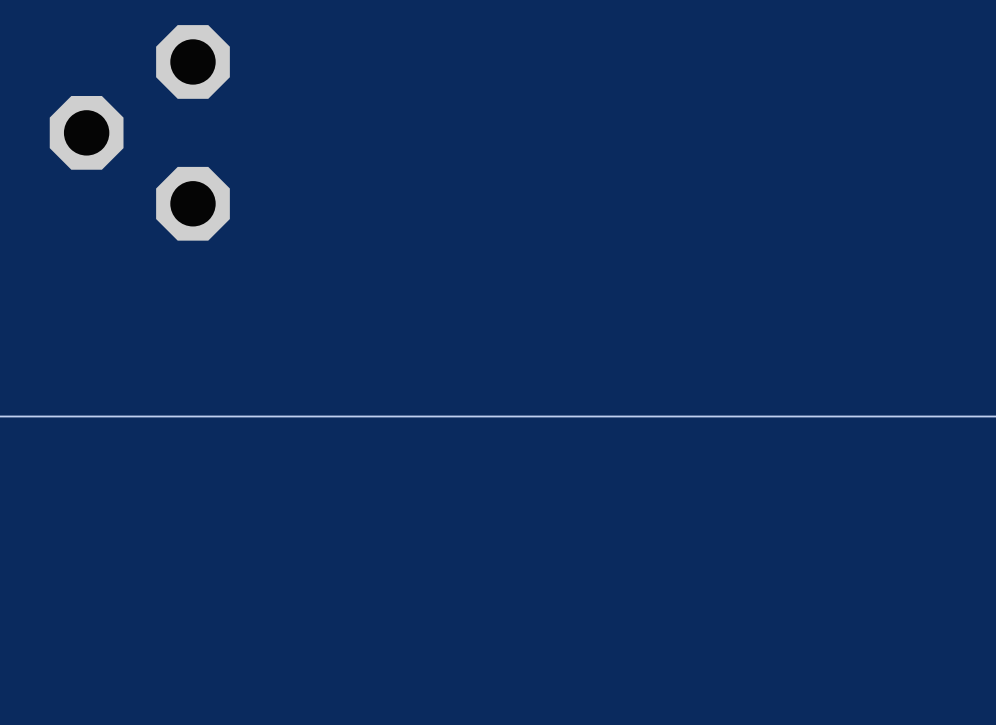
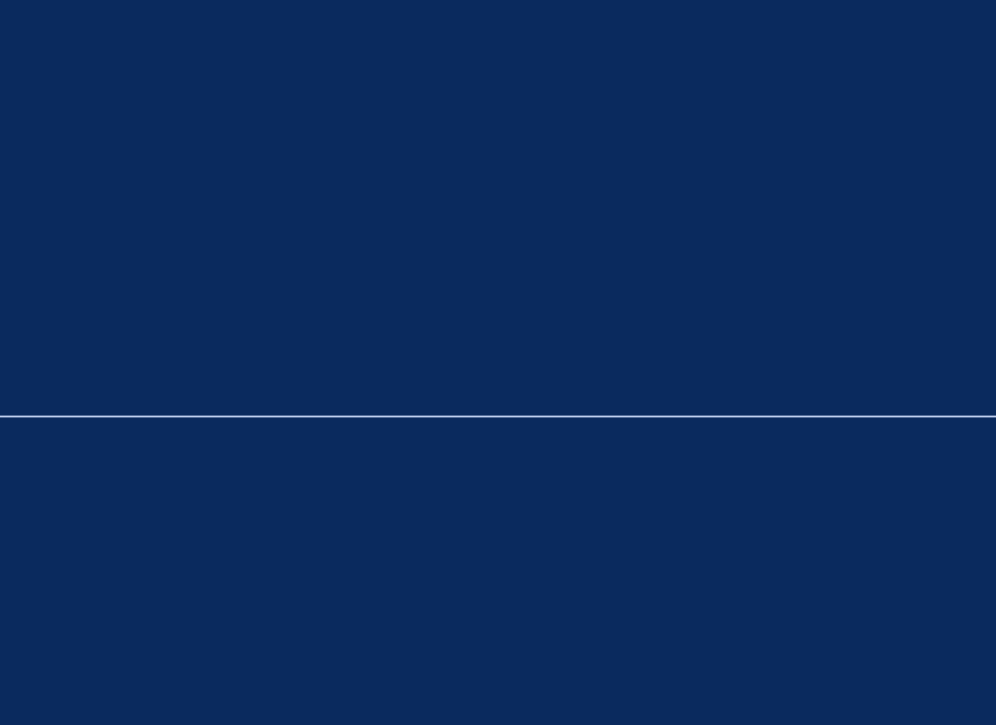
part: (139, 132) -> none

